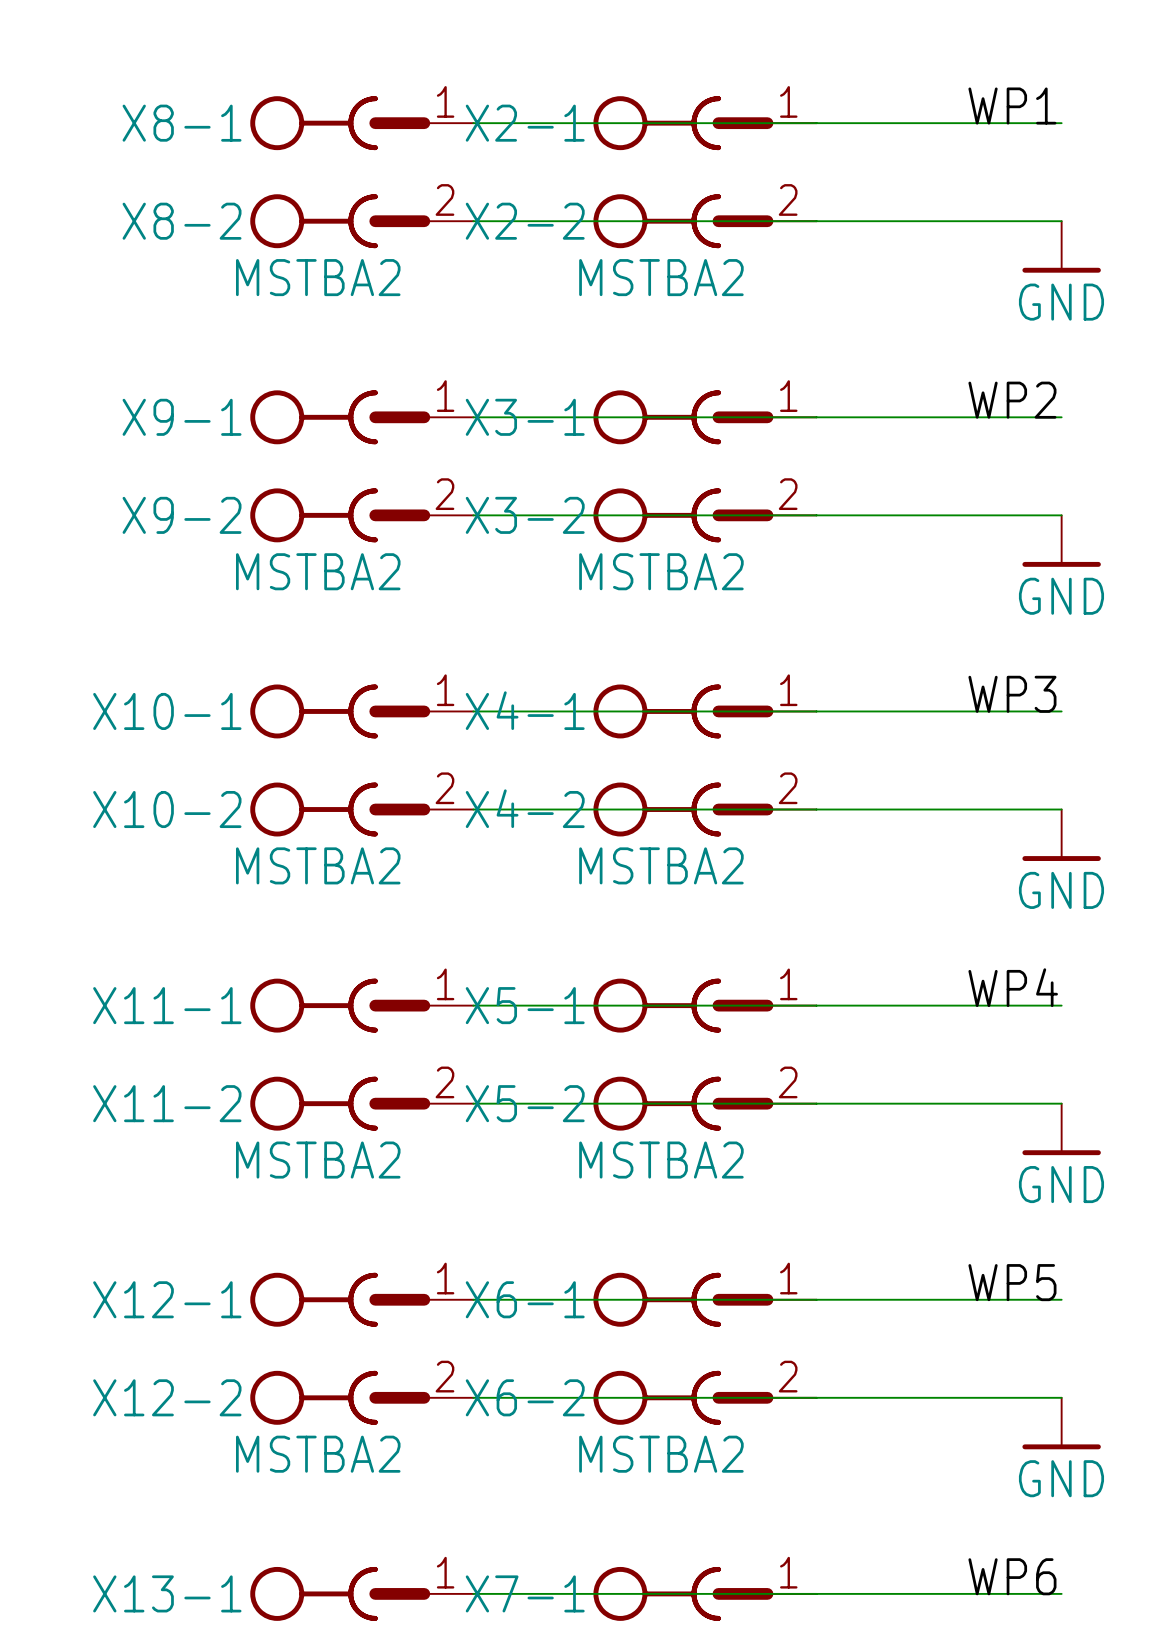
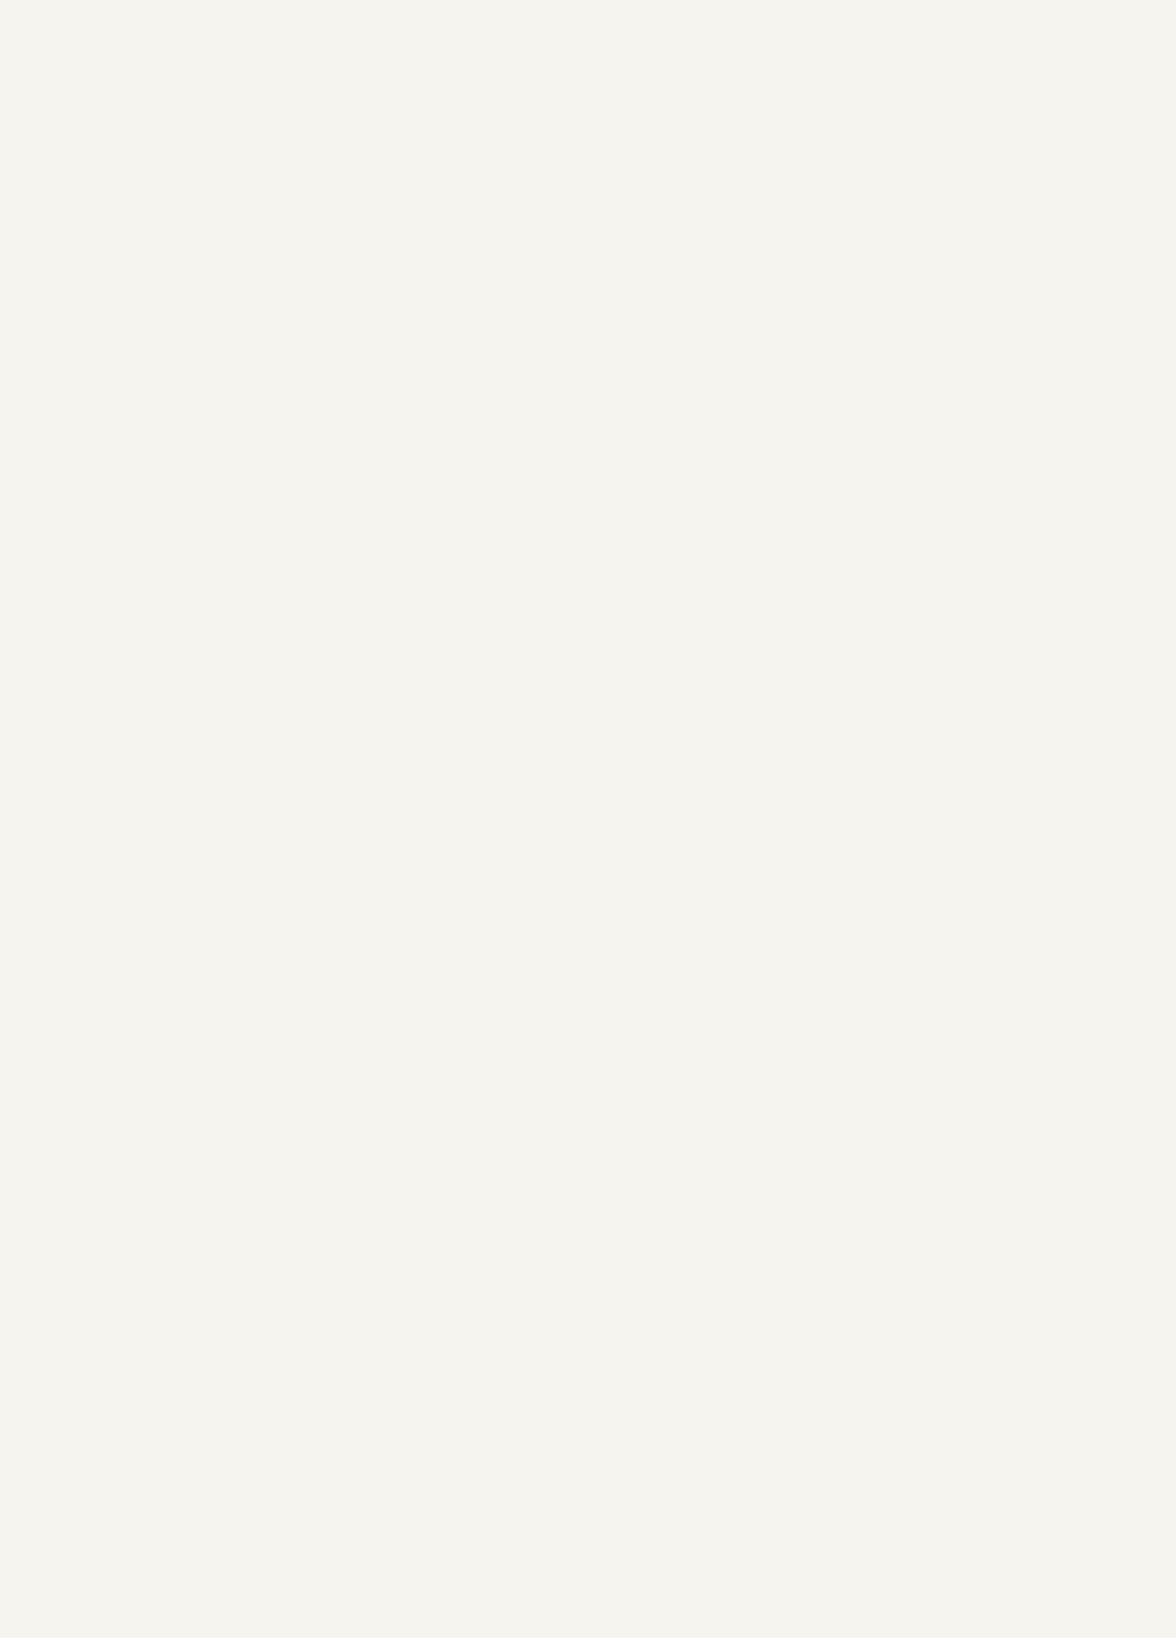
label: WP1 (1012, 106) -> none
X8-1: (361, 123) -> none
wire: (473, 123) (1061, 123) -> none
X2-1: (704, 123) -> none
X8-2: MSTBA2 (361, 221) -> none
wire: (473, 221) (1061, 221) -> none
X2-2: MSTBA2 (704, 221) -> none
power symbol: GND (1061, 246) -> none
label: WP2 (1012, 400) -> none
X9-1: (361, 417) -> none
wire: (473, 417) (1061, 417) -> none
X3-1: (704, 417) -> none
X9-2: MSTBA2 (361, 515) -> none
wire: (473, 515) (1061, 515) -> none
X3-2: MSTBA2 (704, 515) -> none
power symbol: GND (1061, 541) -> none
label: WP3 (1012, 694) -> none
X10-1: (361, 711) -> none
wire: (473, 711) (1061, 711) -> none
X4-1: (704, 711) -> none
X10-2: MSTBA2 (361, 809) -> none
wire: (473, 809) (1061, 809) -> none
X4-2: MSTBA2 (704, 809) -> none
power symbol: GND (1061, 835) -> none
label: WP4 (1013, 987) -> none
X11-1: (361, 1005) -> none
wire: (473, 1005) (1061, 1005) -> none
X5-1: (704, 1005) -> none
X11-2: MSTBA2 (361, 1103) -> none
wire: (473, 1103) (1061, 1103) -> none
X5-2: MSTBA2 (704, 1103) -> none
power symbol: GND (1061, 1129) -> none
label: WP5 (1012, 1282) -> none
X12-1: (361, 1299) -> none
wire: (473, 1299) (1061, 1299) -> none
X6-1: (704, 1299) -> none
X12-2: MSTBA2 (361, 1397) -> none
wire: (473, 1397) (1061, 1397) -> none
X6-2: MSTBA2 (704, 1397) -> none
power symbol: GND (1061, 1423) -> none
label: WP6 (1012, 1576) -> none
X13-1: (361, 1593) -> none
wire: (473, 1593) (1061, 1593) -> none
X7-1: (704, 1593) -> none

